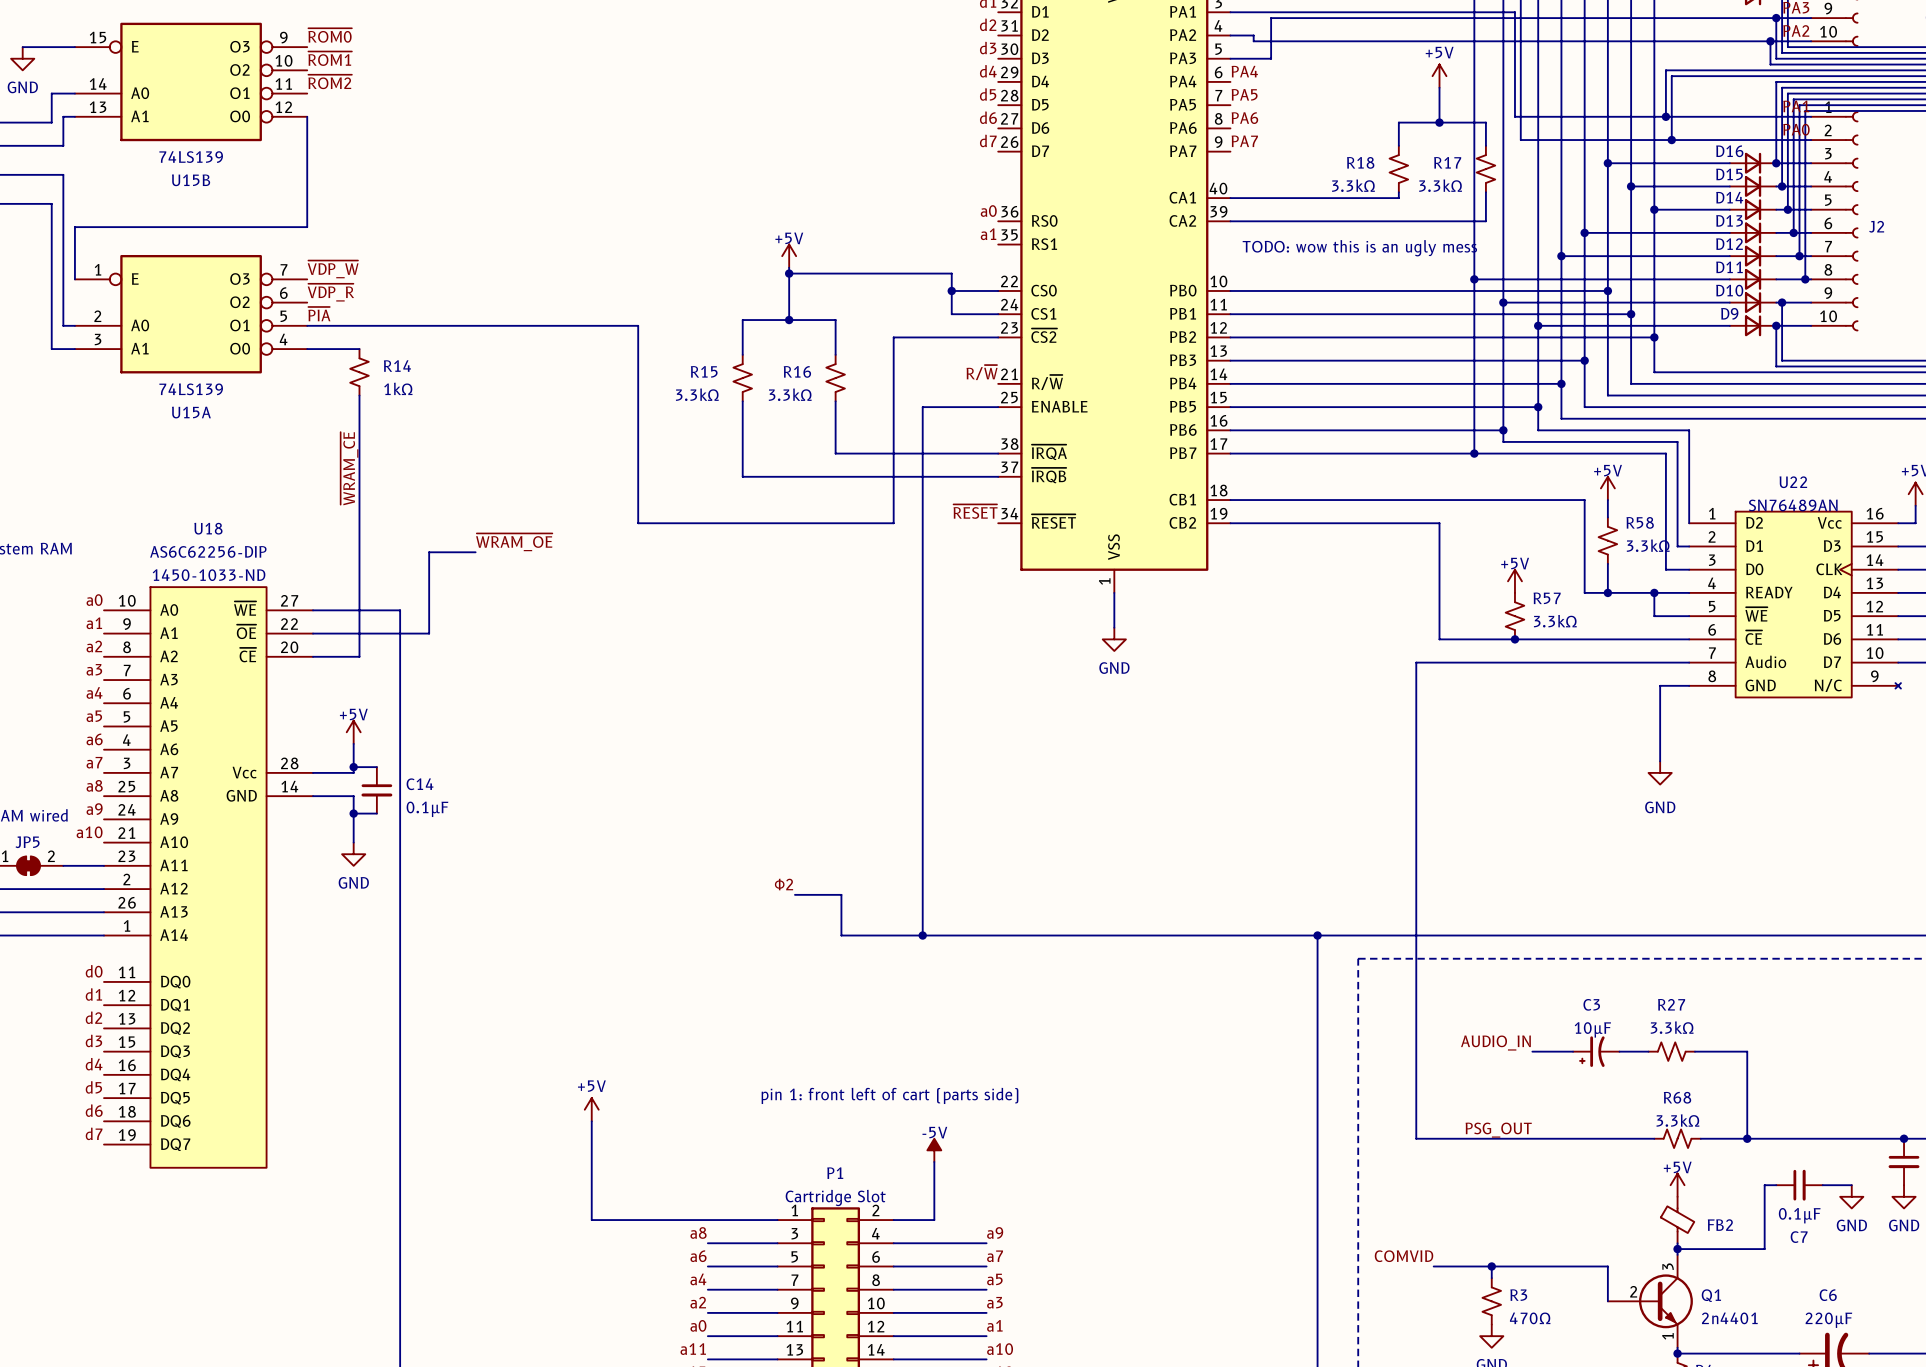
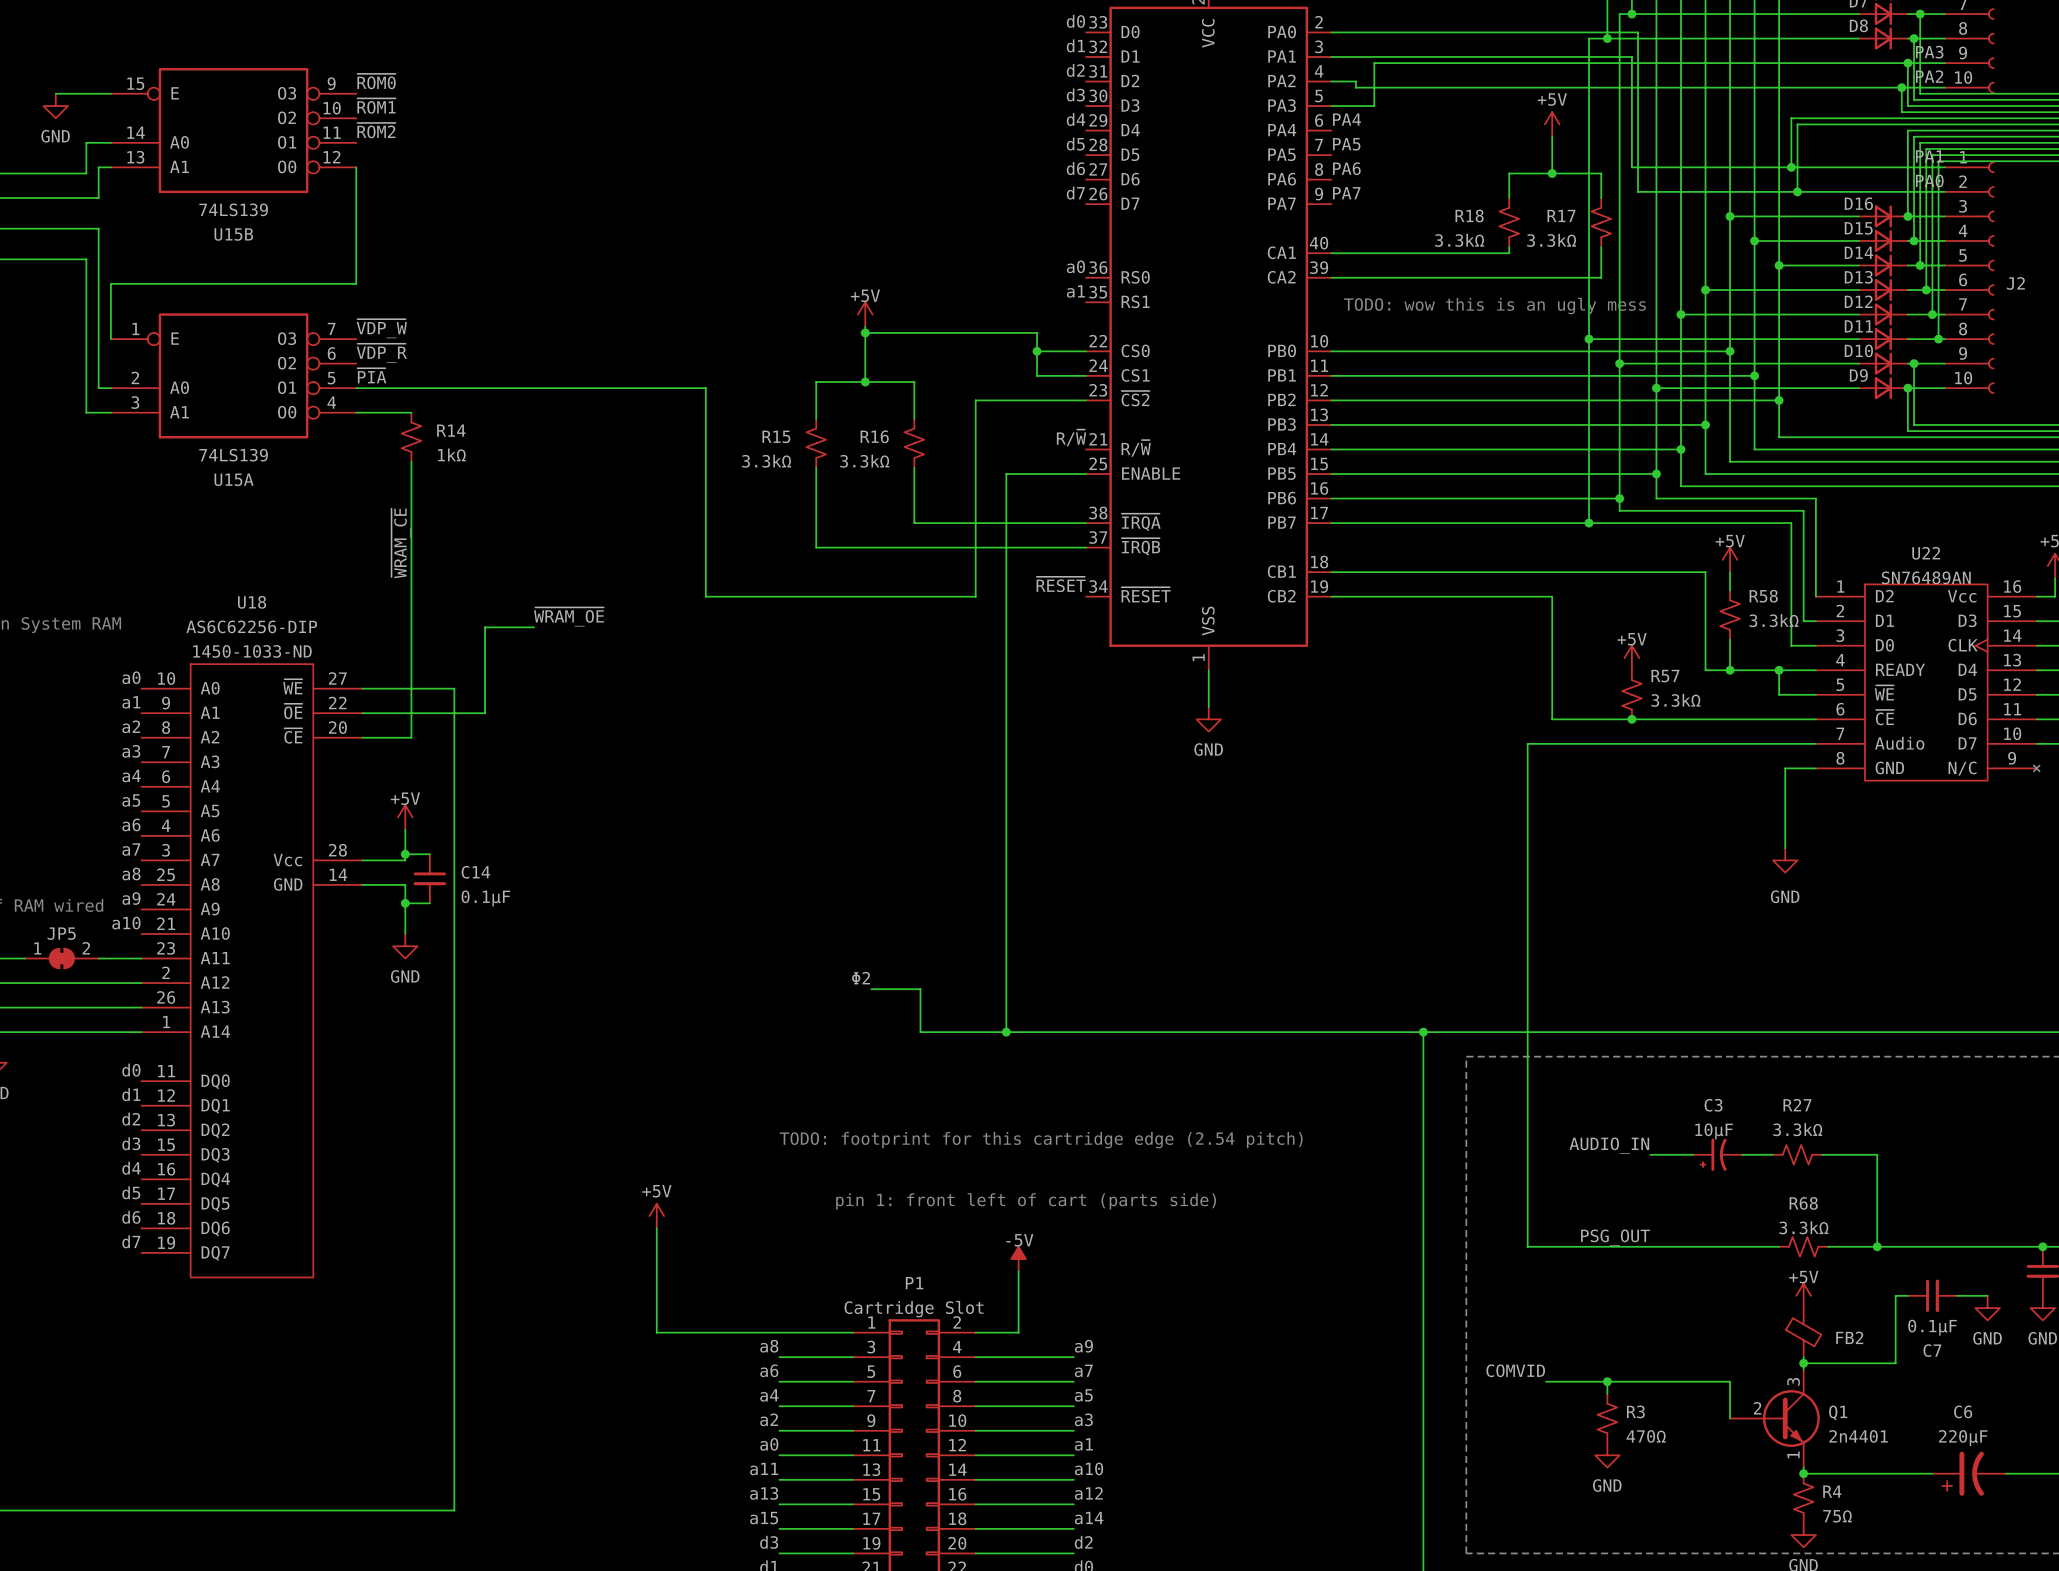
text: none -> TODO: footprint for this cartridge edge (2.54 pitch) (1041, 1140)

